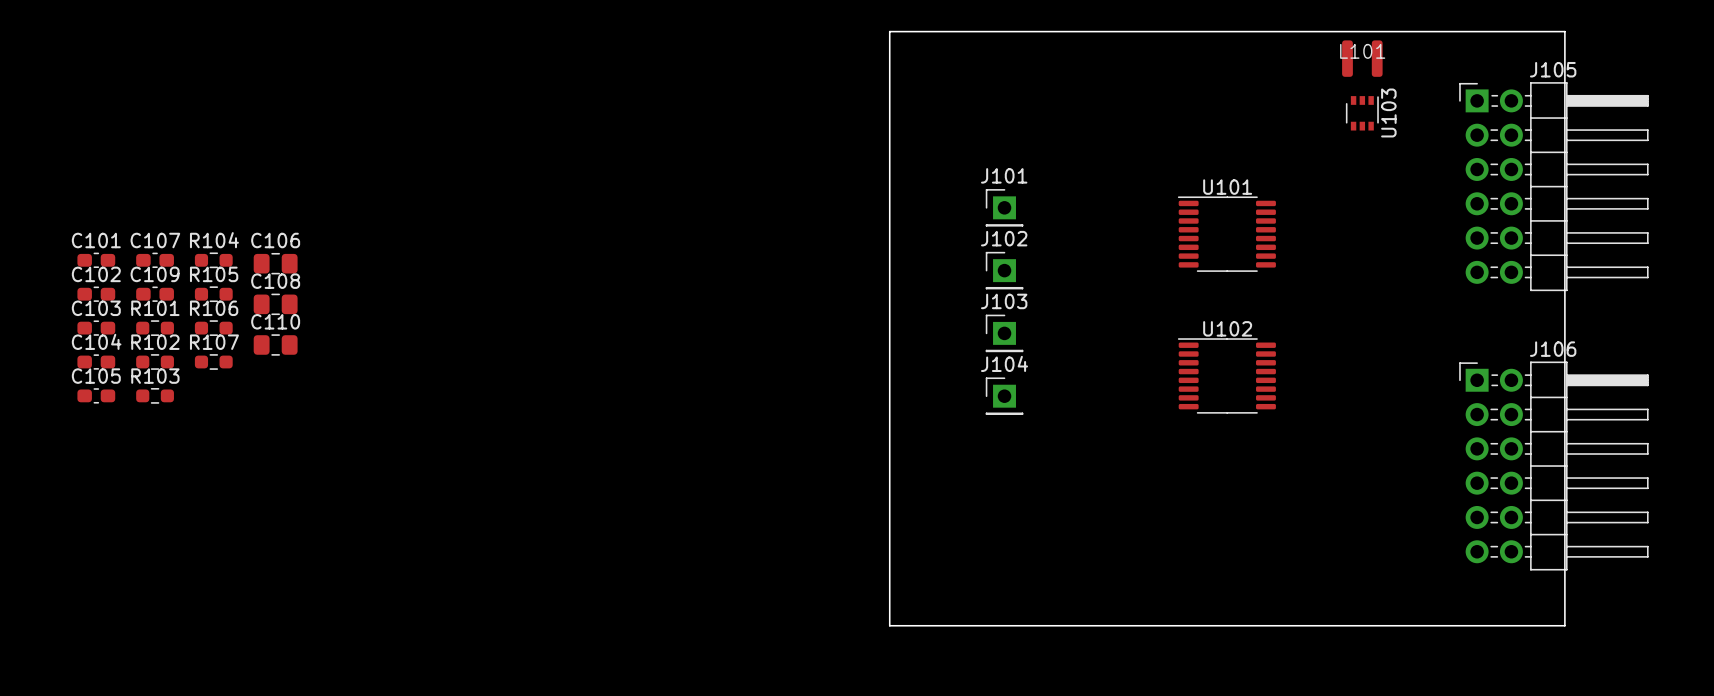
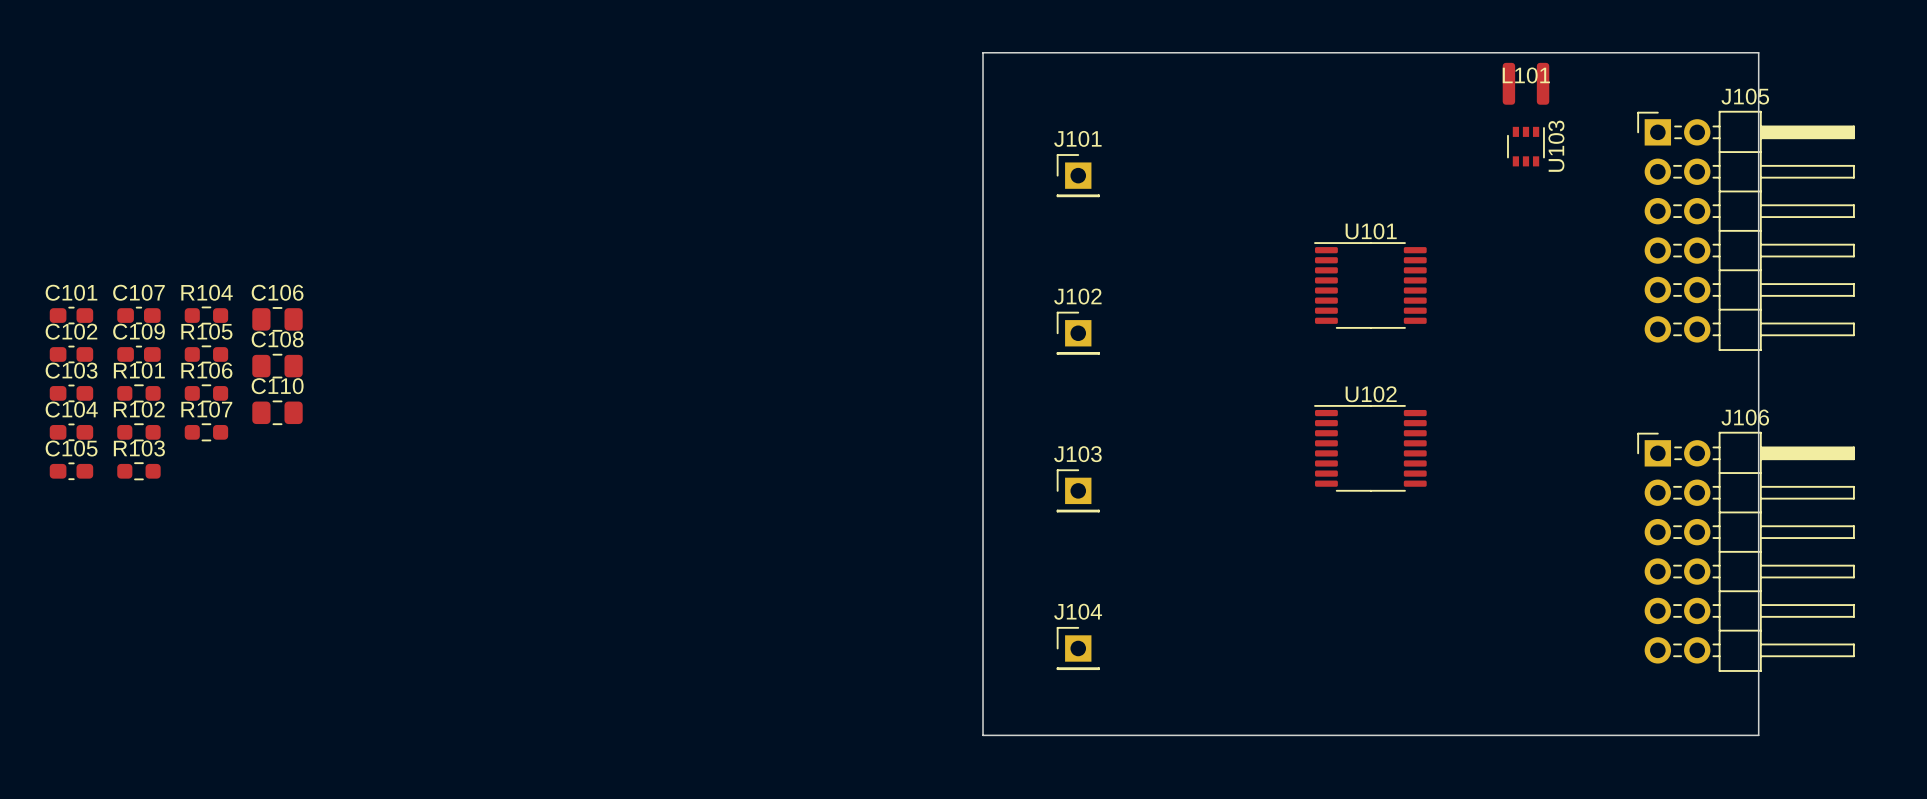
J101 position: (1004, 207) -> (1078, 175)
J102 position: (1004, 270) -> (1078, 333)
J103 position: (1004, 333) -> (1078, 490)
J104 position: (1004, 396) -> (1078, 648)

